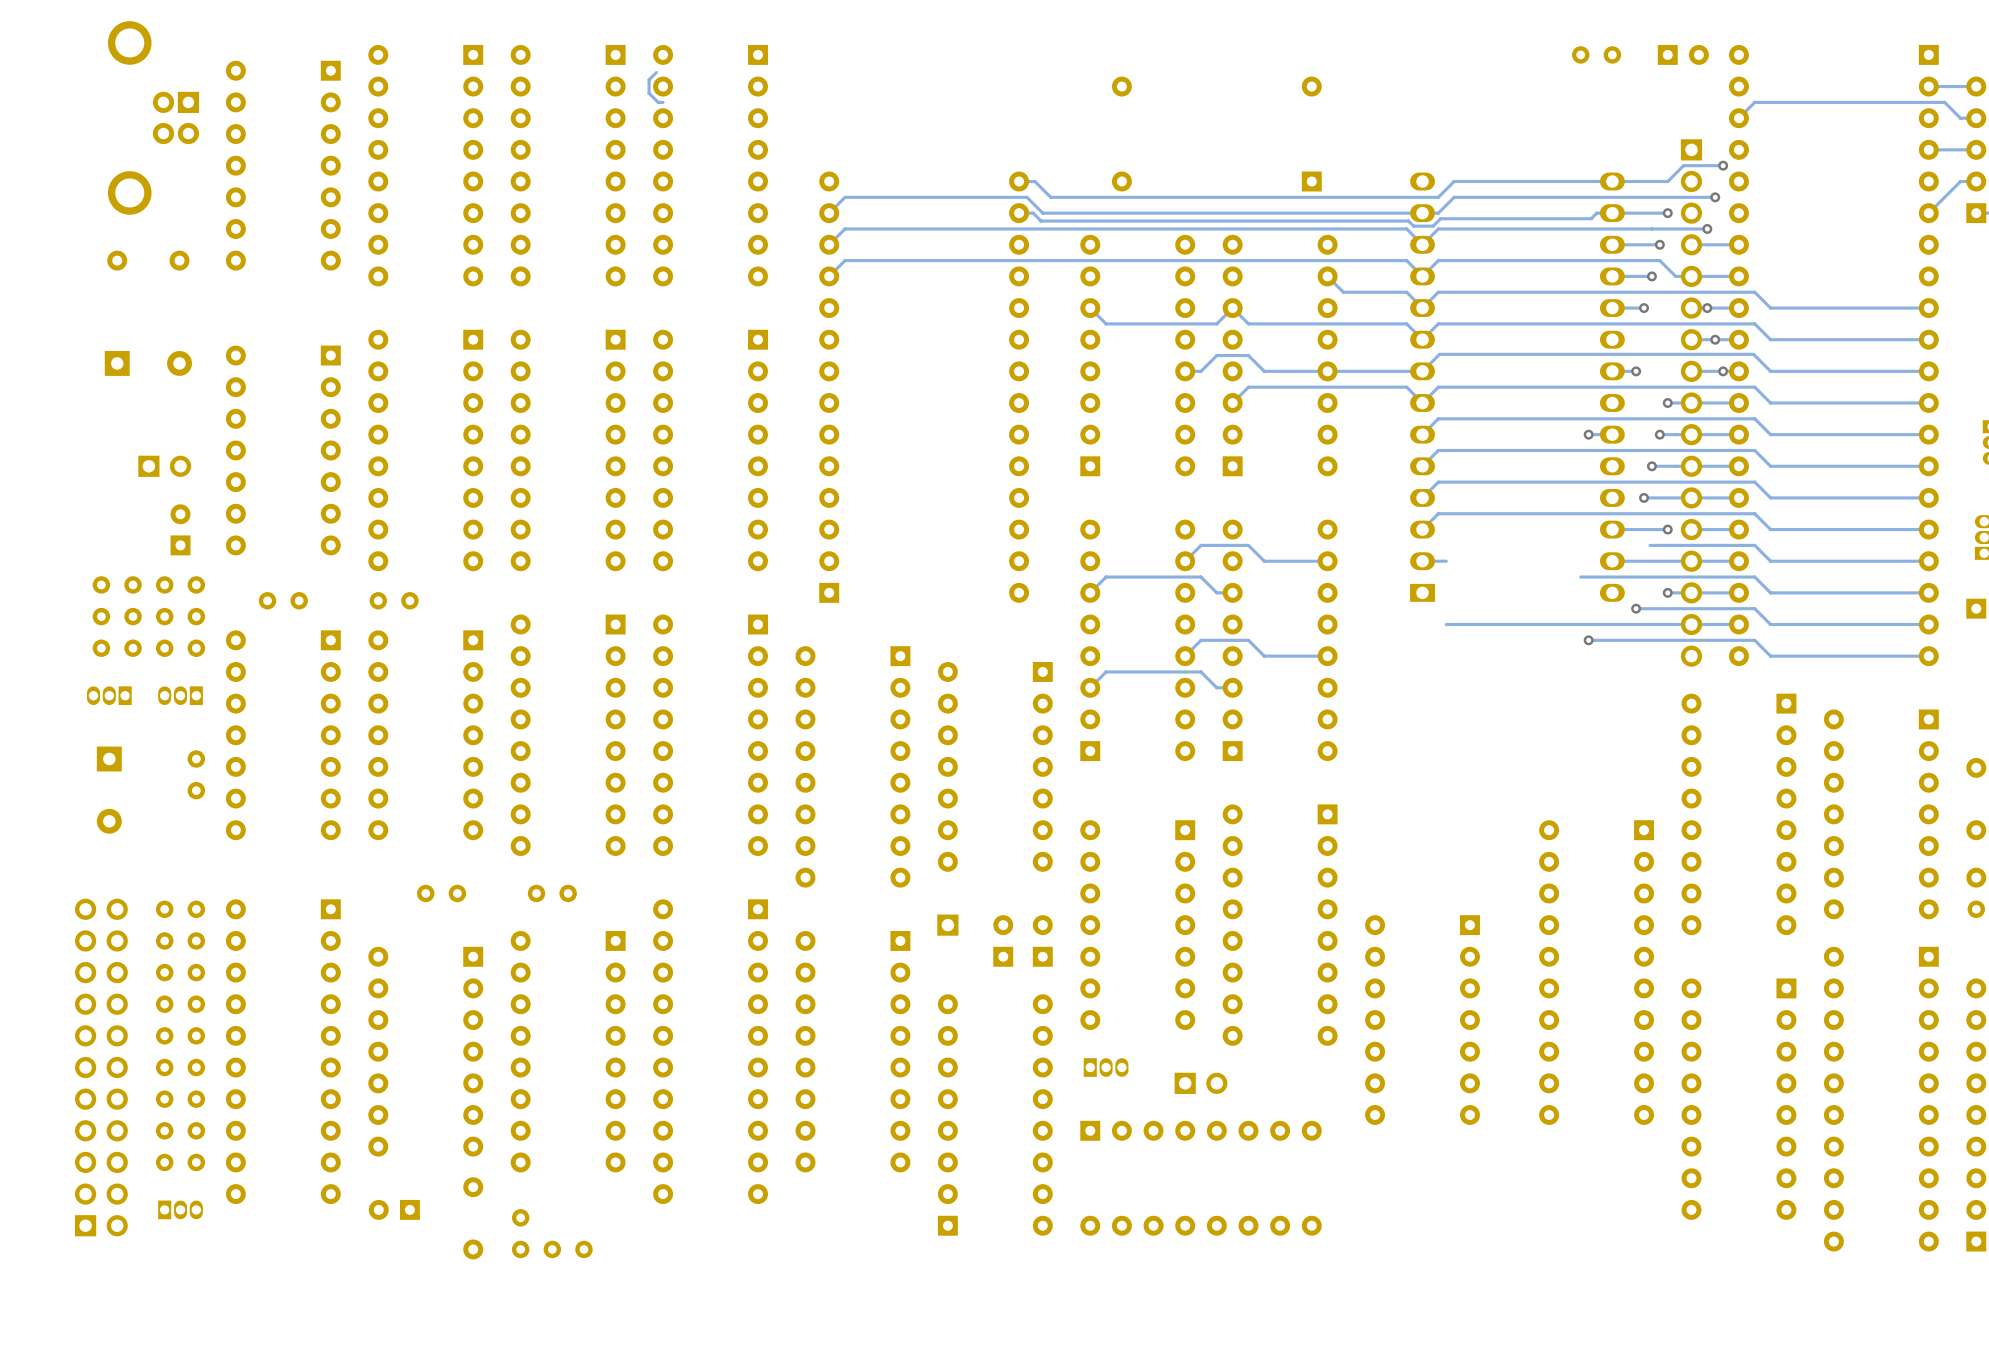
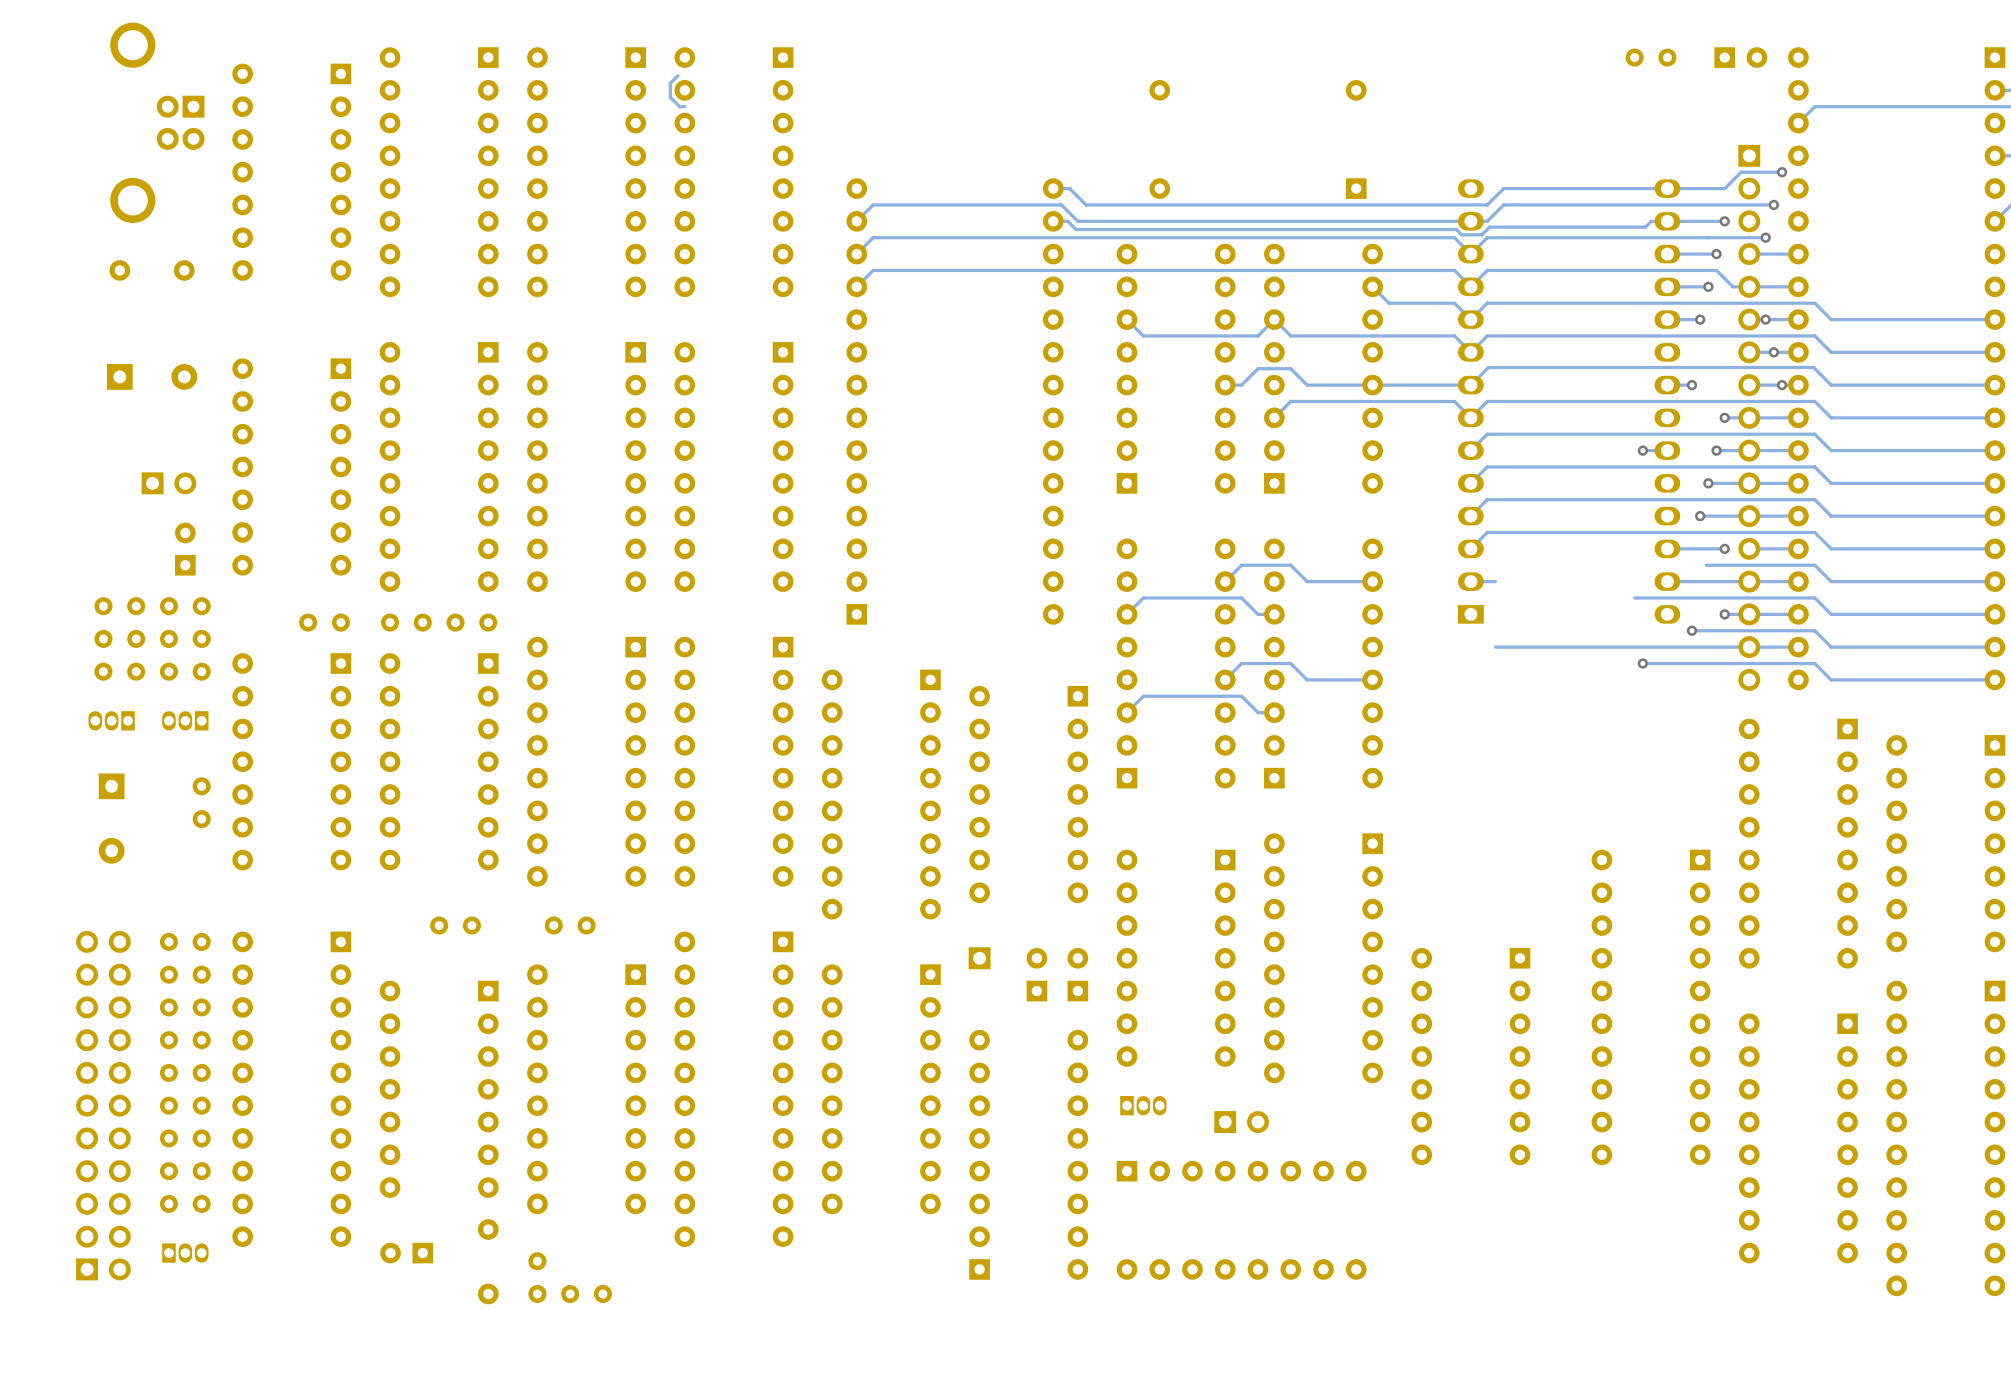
part position: (283, 600) -> (324, 622)
part: none -> (471, 622)

